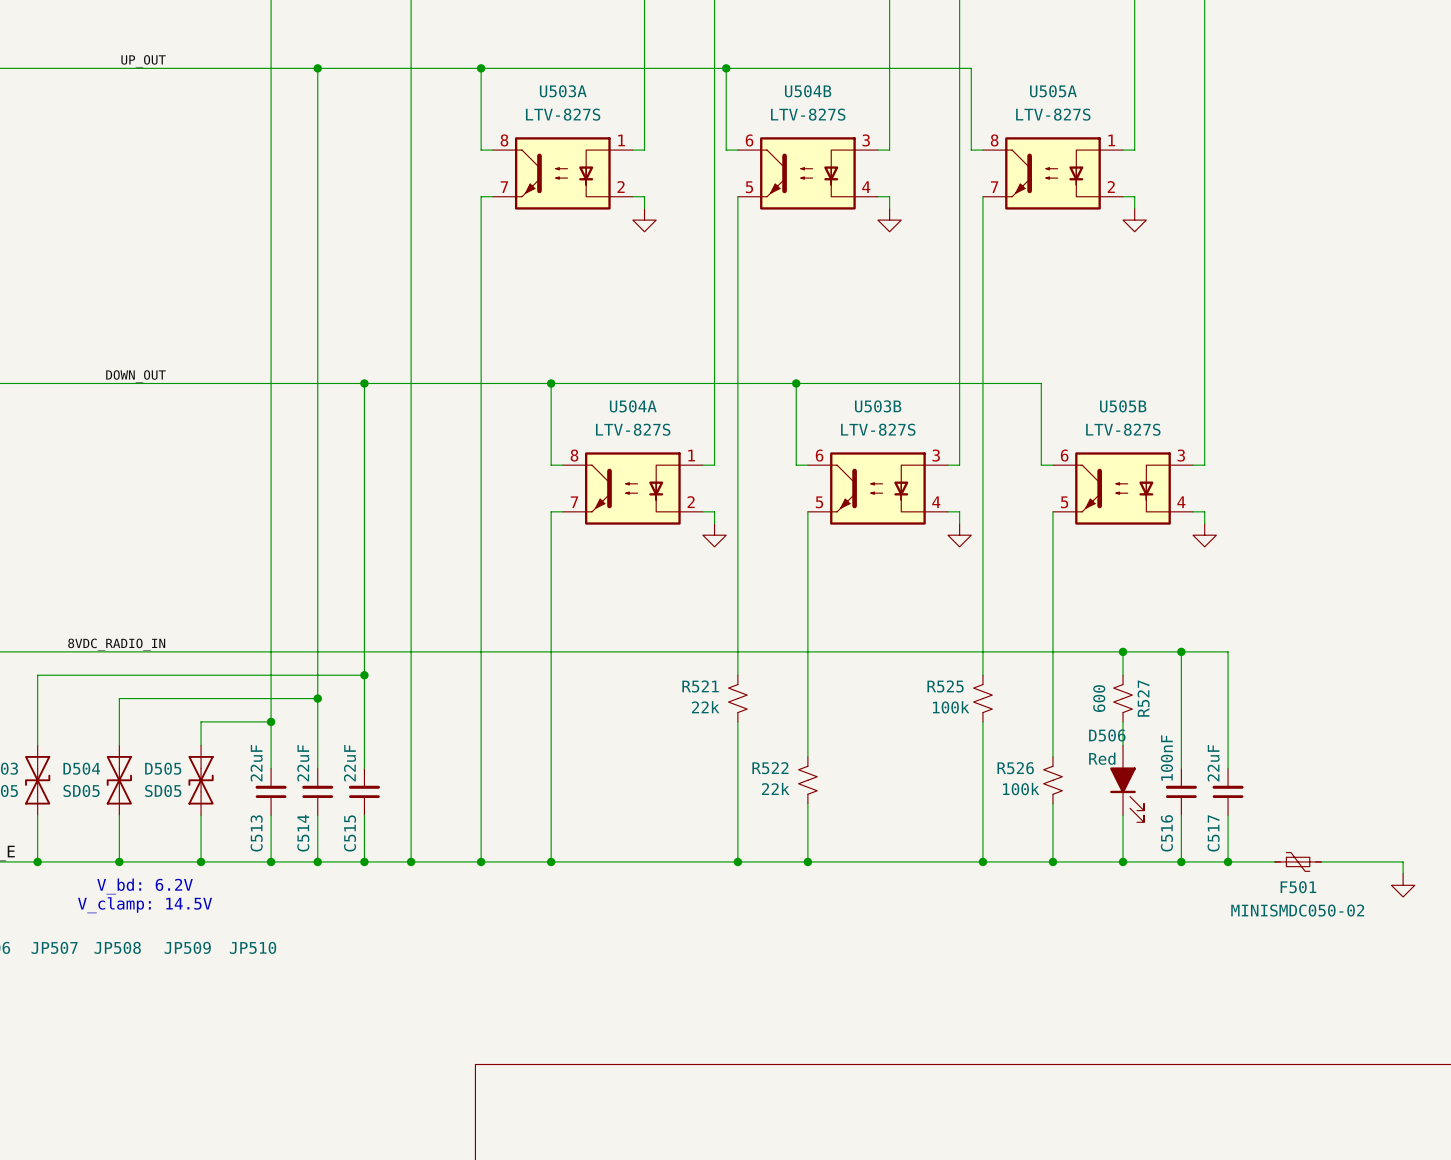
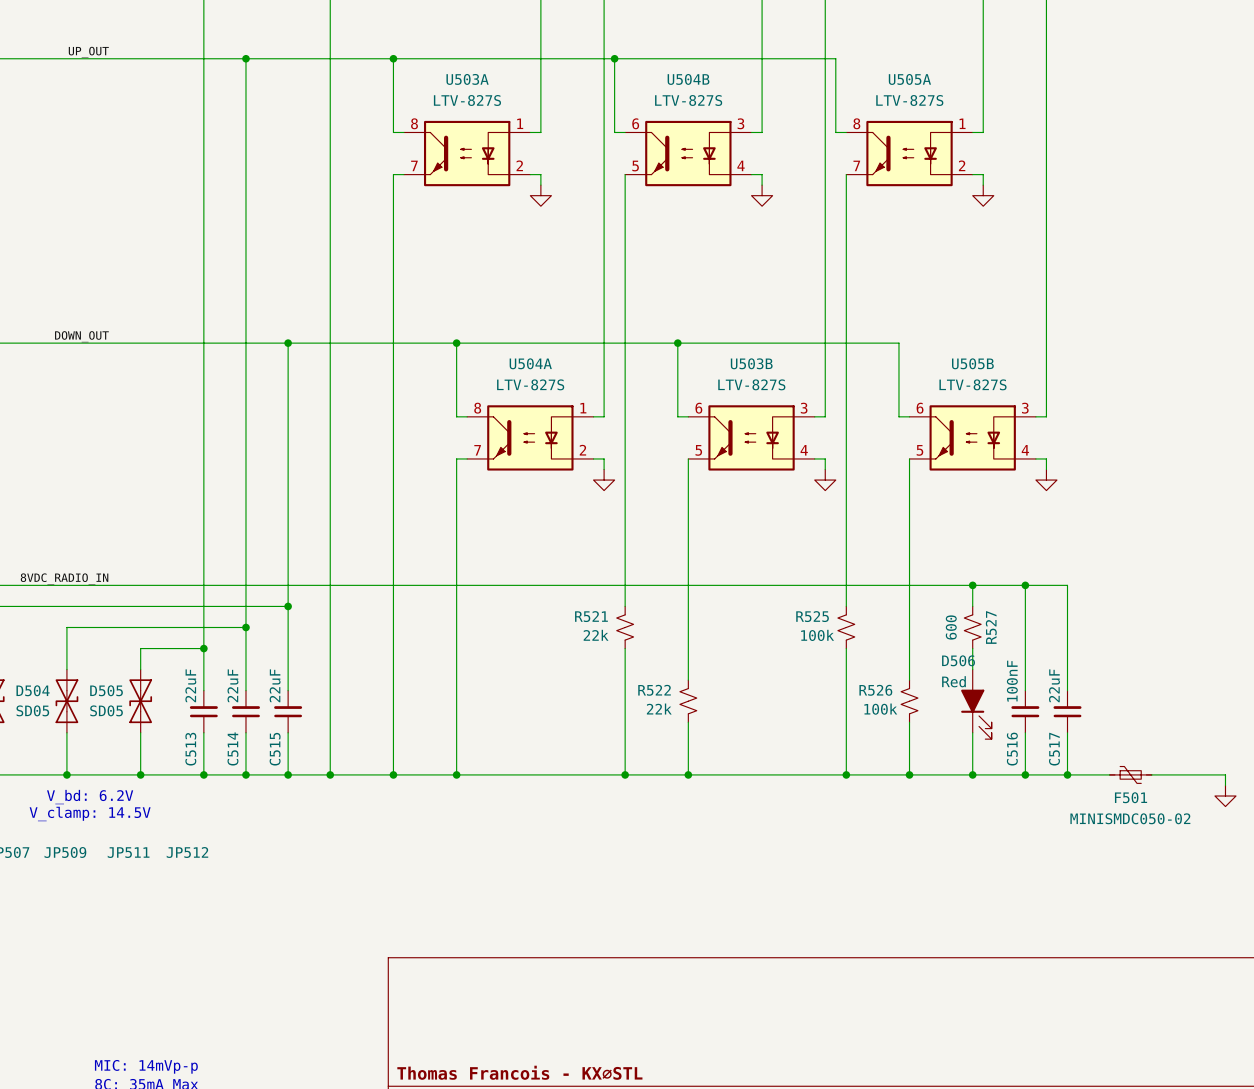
JP508 name: JP508 (117, 947) -> JP509 (65, 852)
JP509 name: JP509 (187, 947) -> JP511 (128, 852)
JP510 name: JP510 (253, 947) -> JP512 (187, 852)

